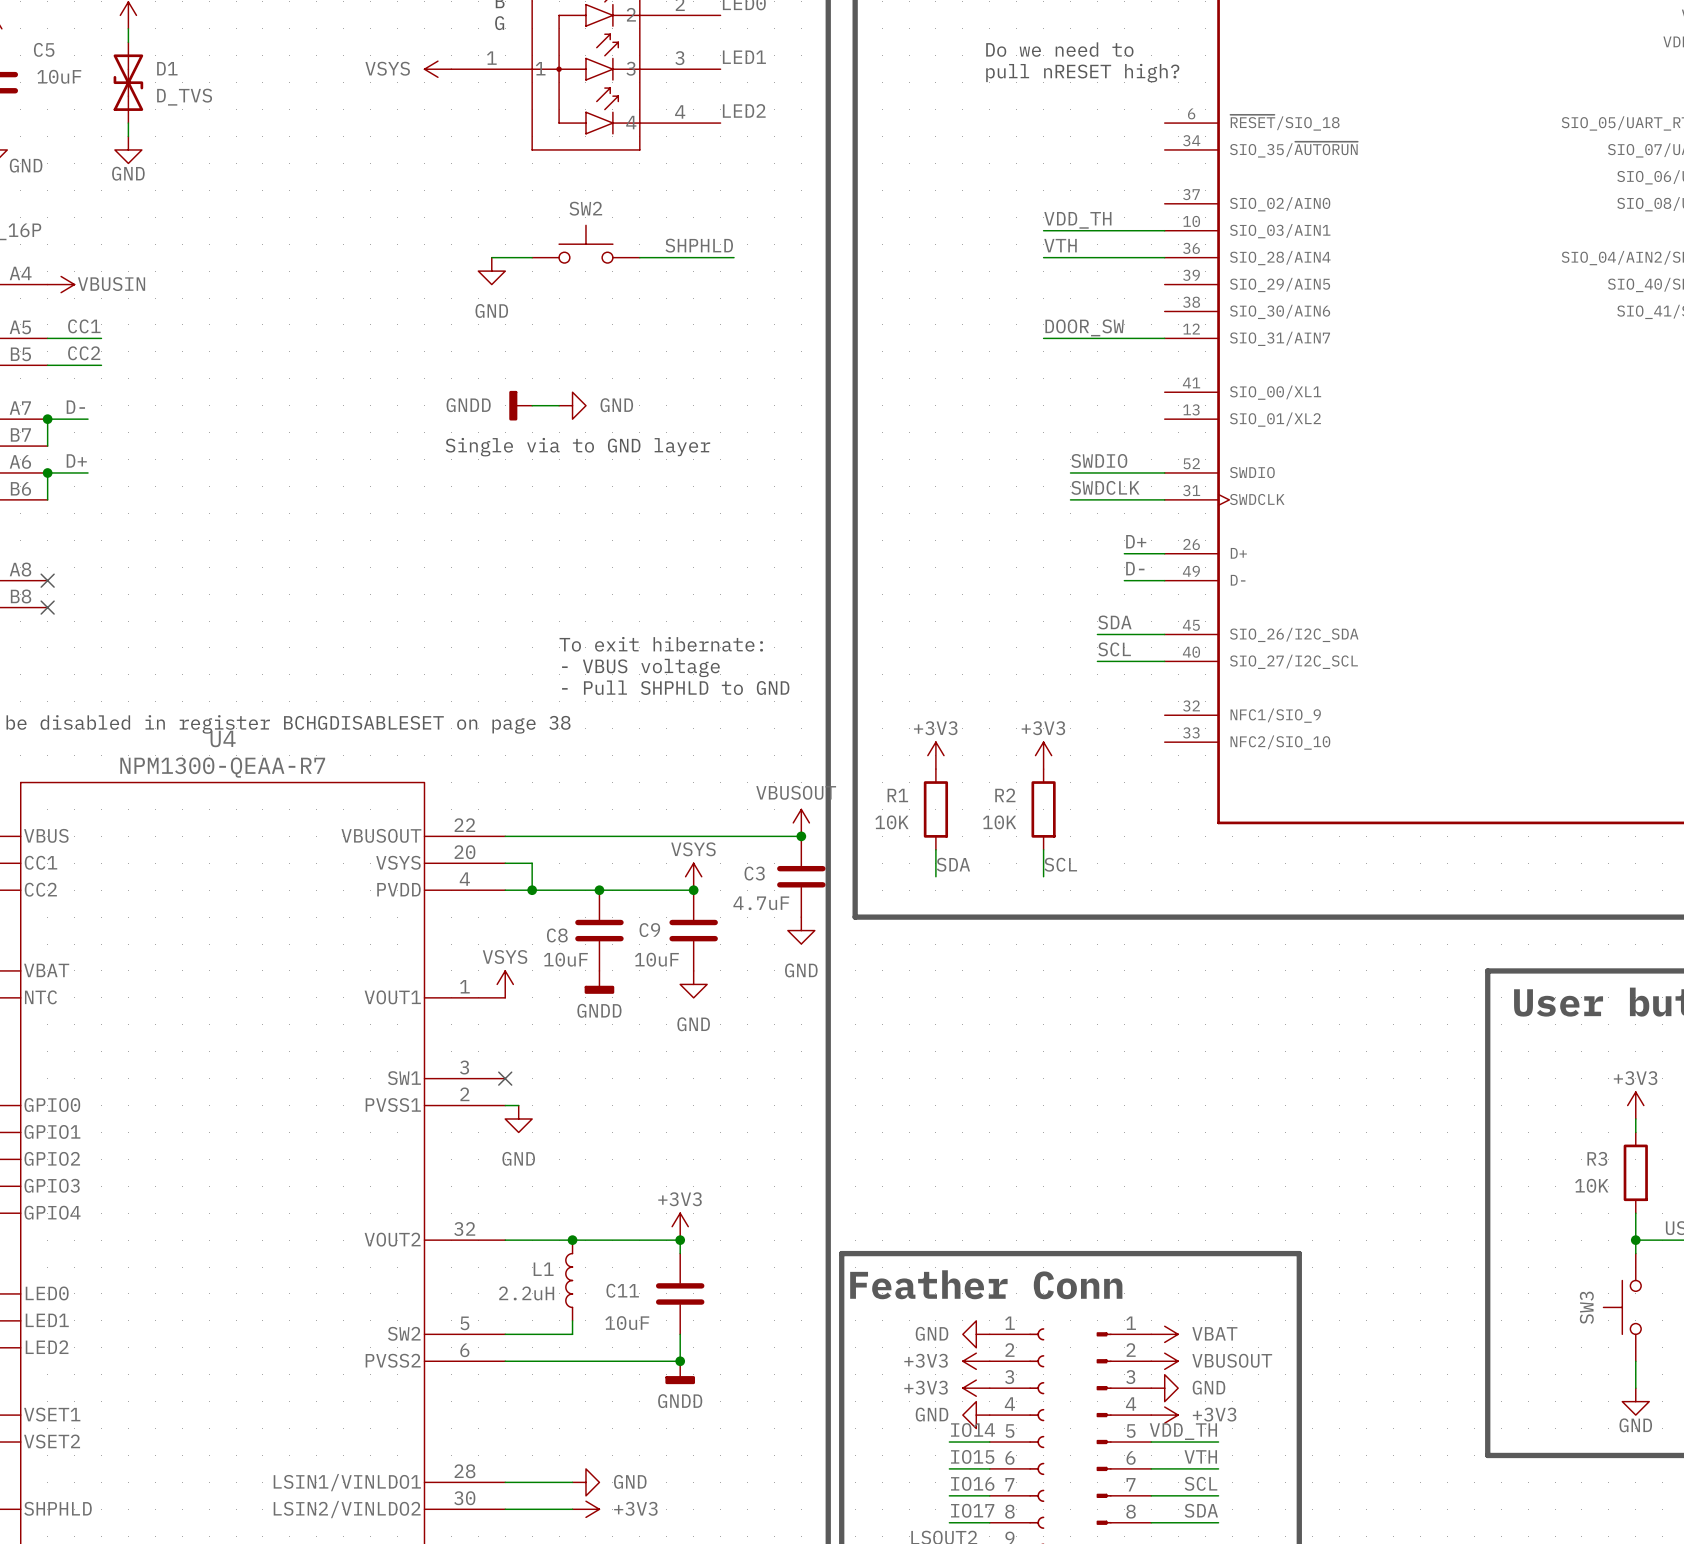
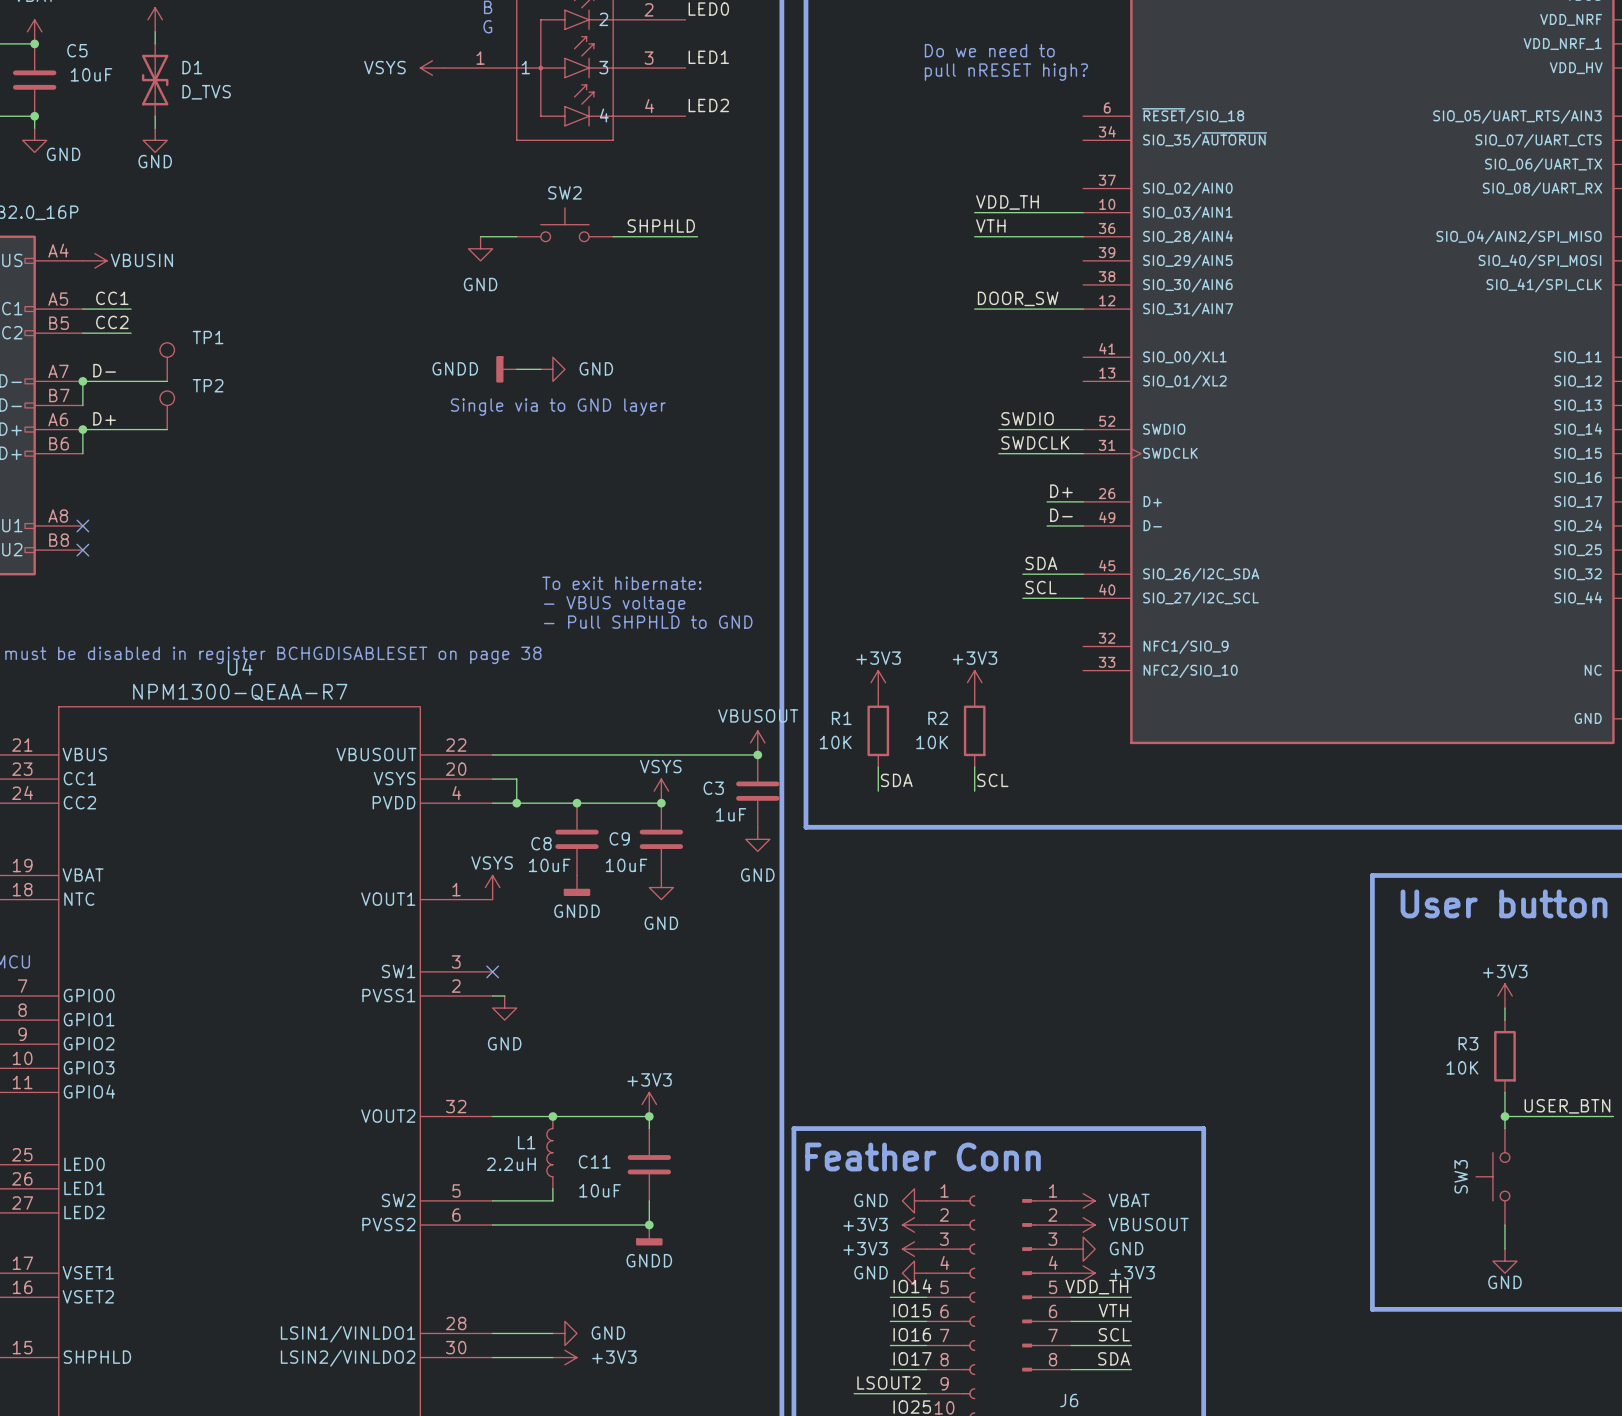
TP1: none -> (167, 362)
wire: none -> (119, 381) (167, 381)
TP2: none -> (167, 410)
wire: none -> (119, 429) (167, 429)
C3 value: 4.7uF (761, 903) -> 1uF (731, 814)

